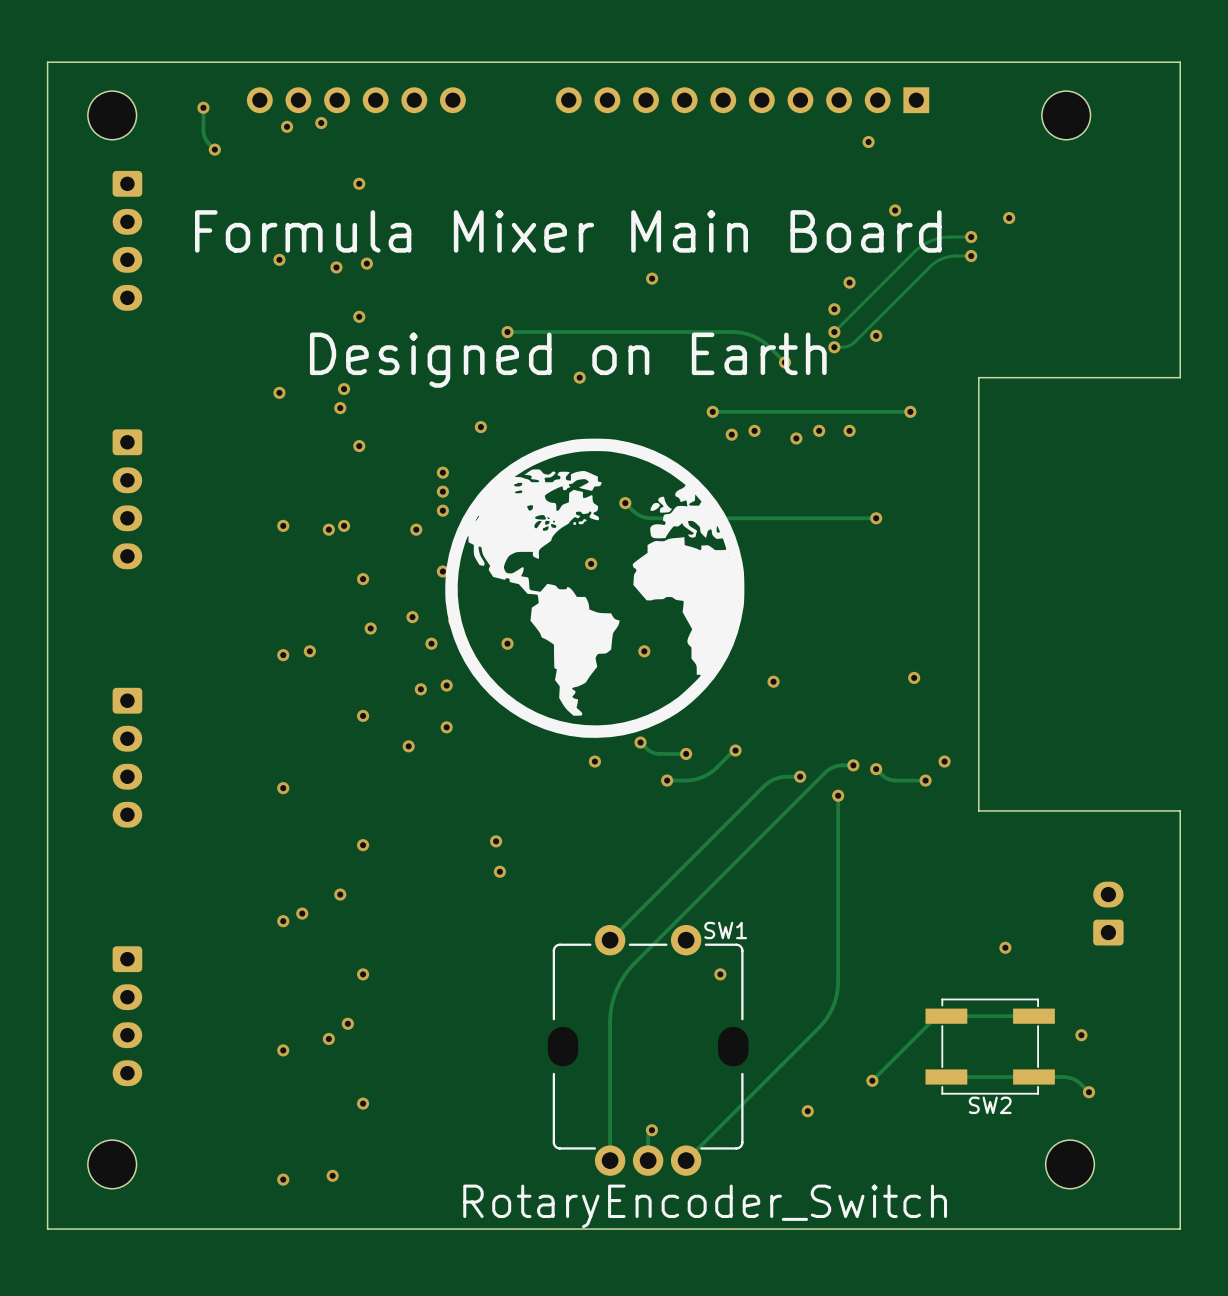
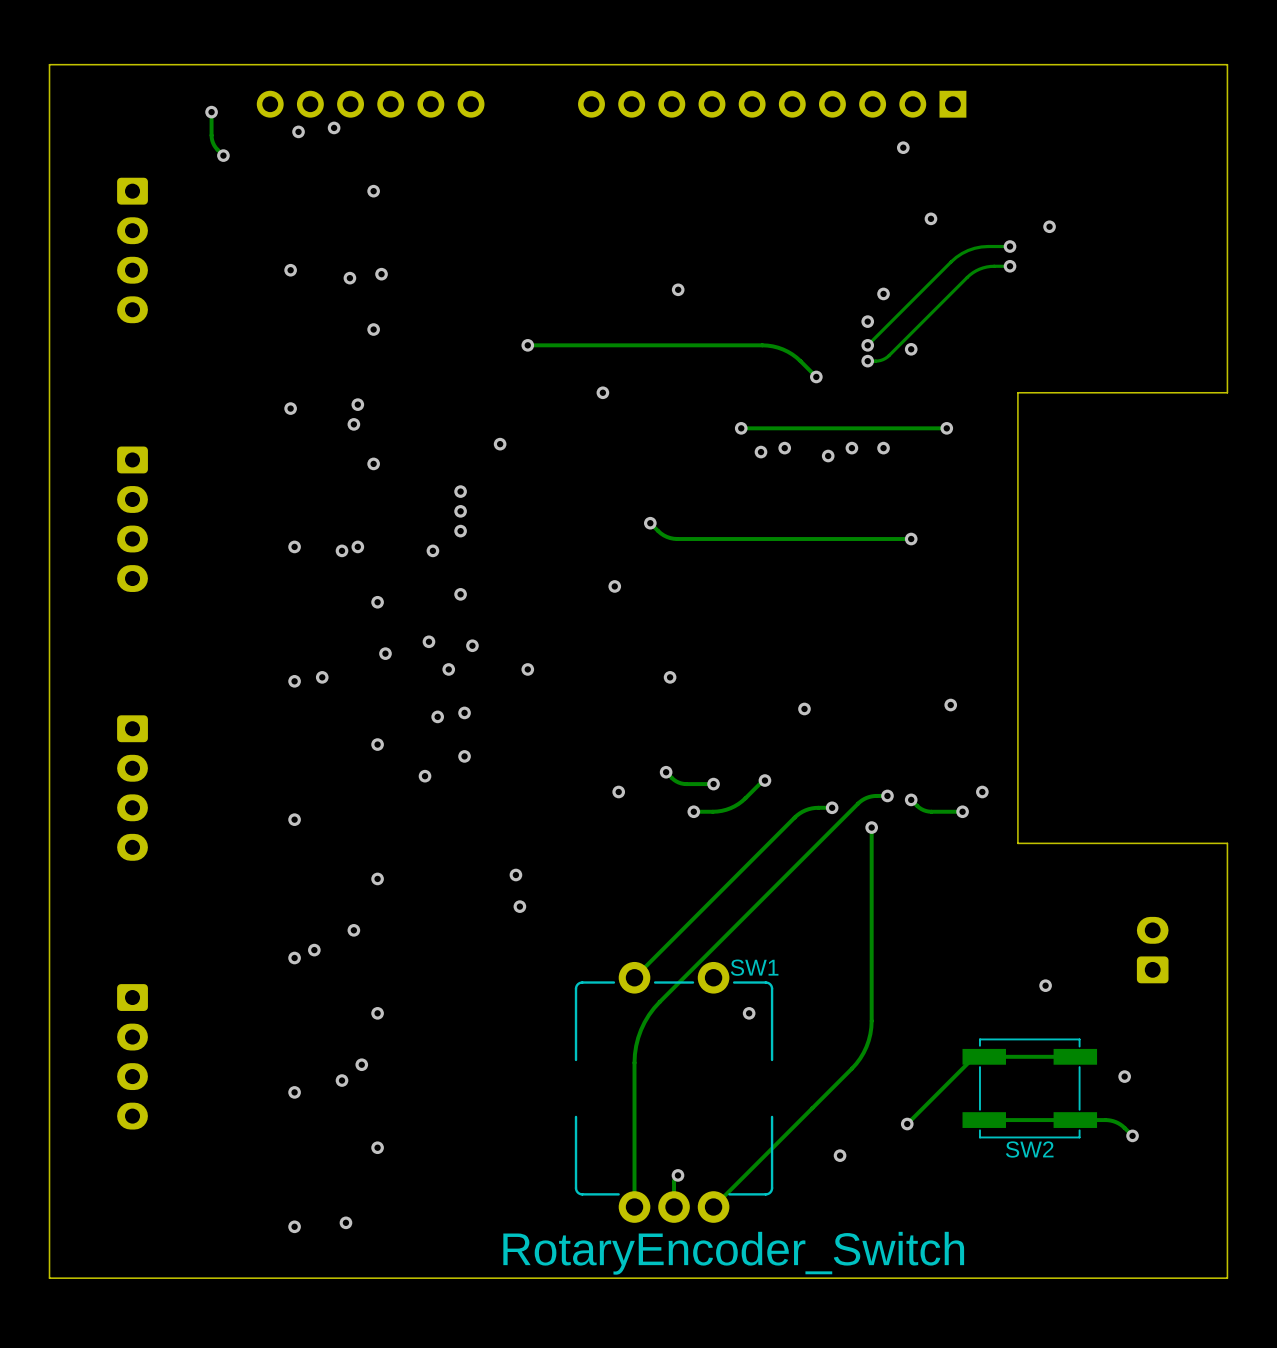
part: (112, 115) -> none
part: (1066, 115) -> none
text: Formula Mixer Main Board (568, 231) -> none
text: Designed on Earth (568, 360) -> none
part: (594, 588) -> none
part: (112, 1164) -> none
part: (1070, 1164) -> none

